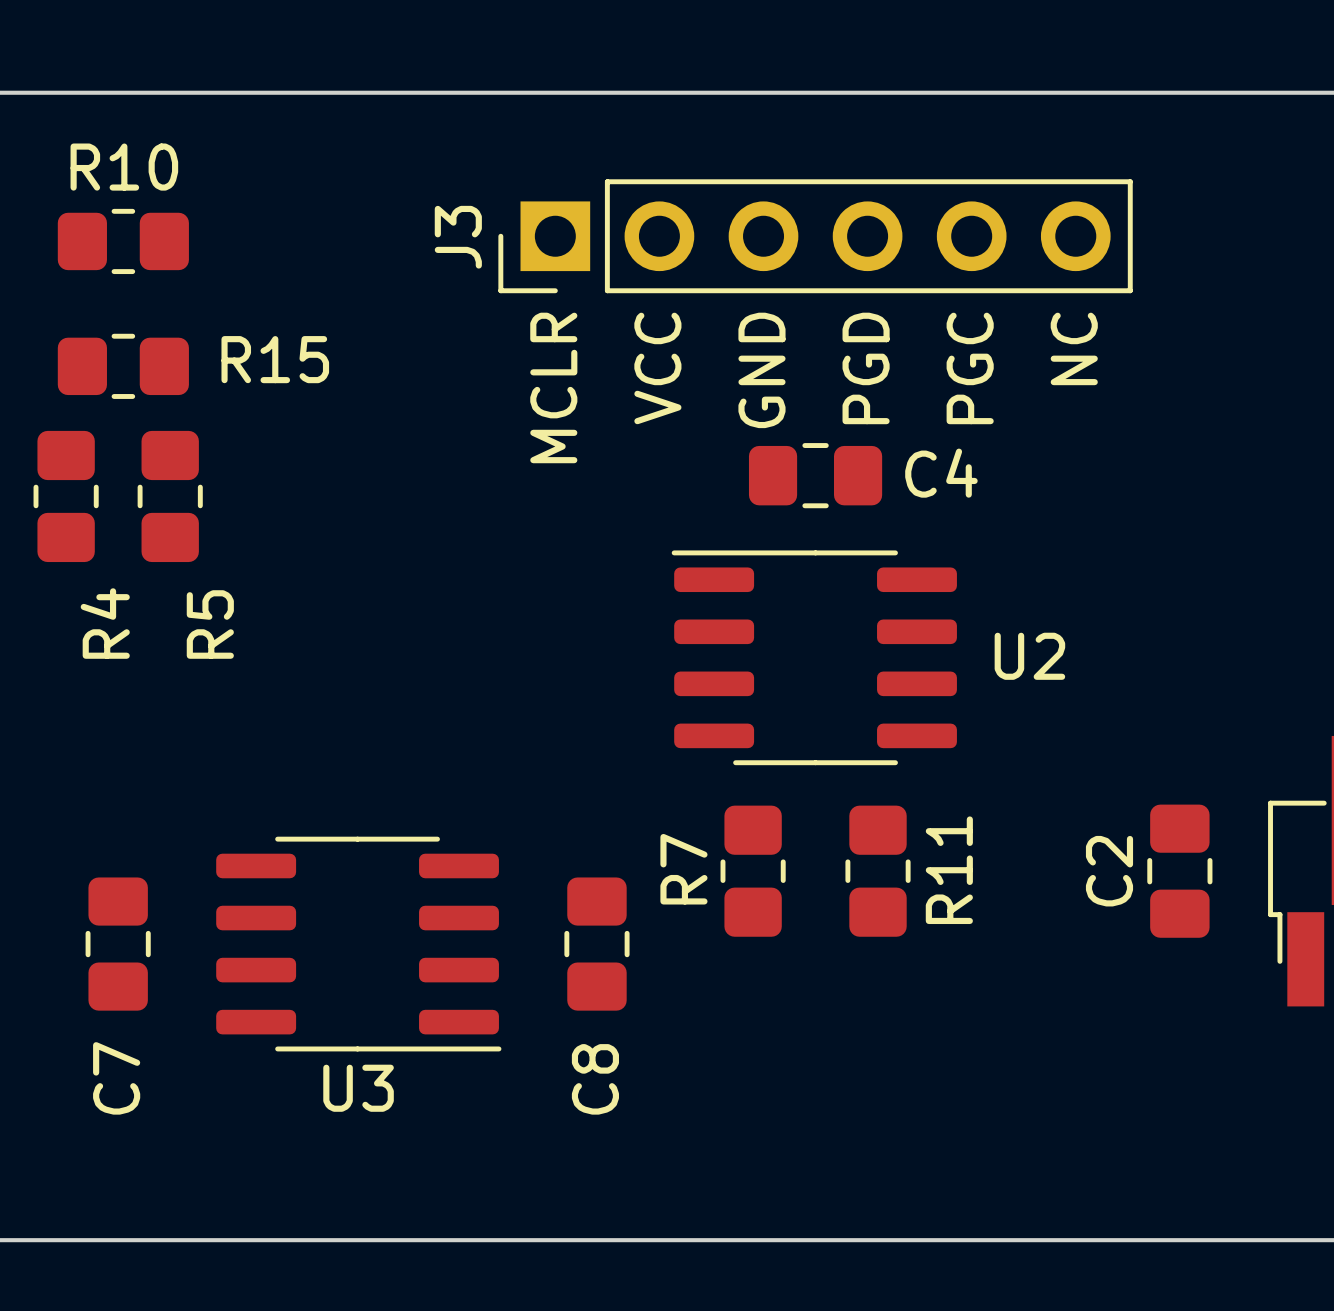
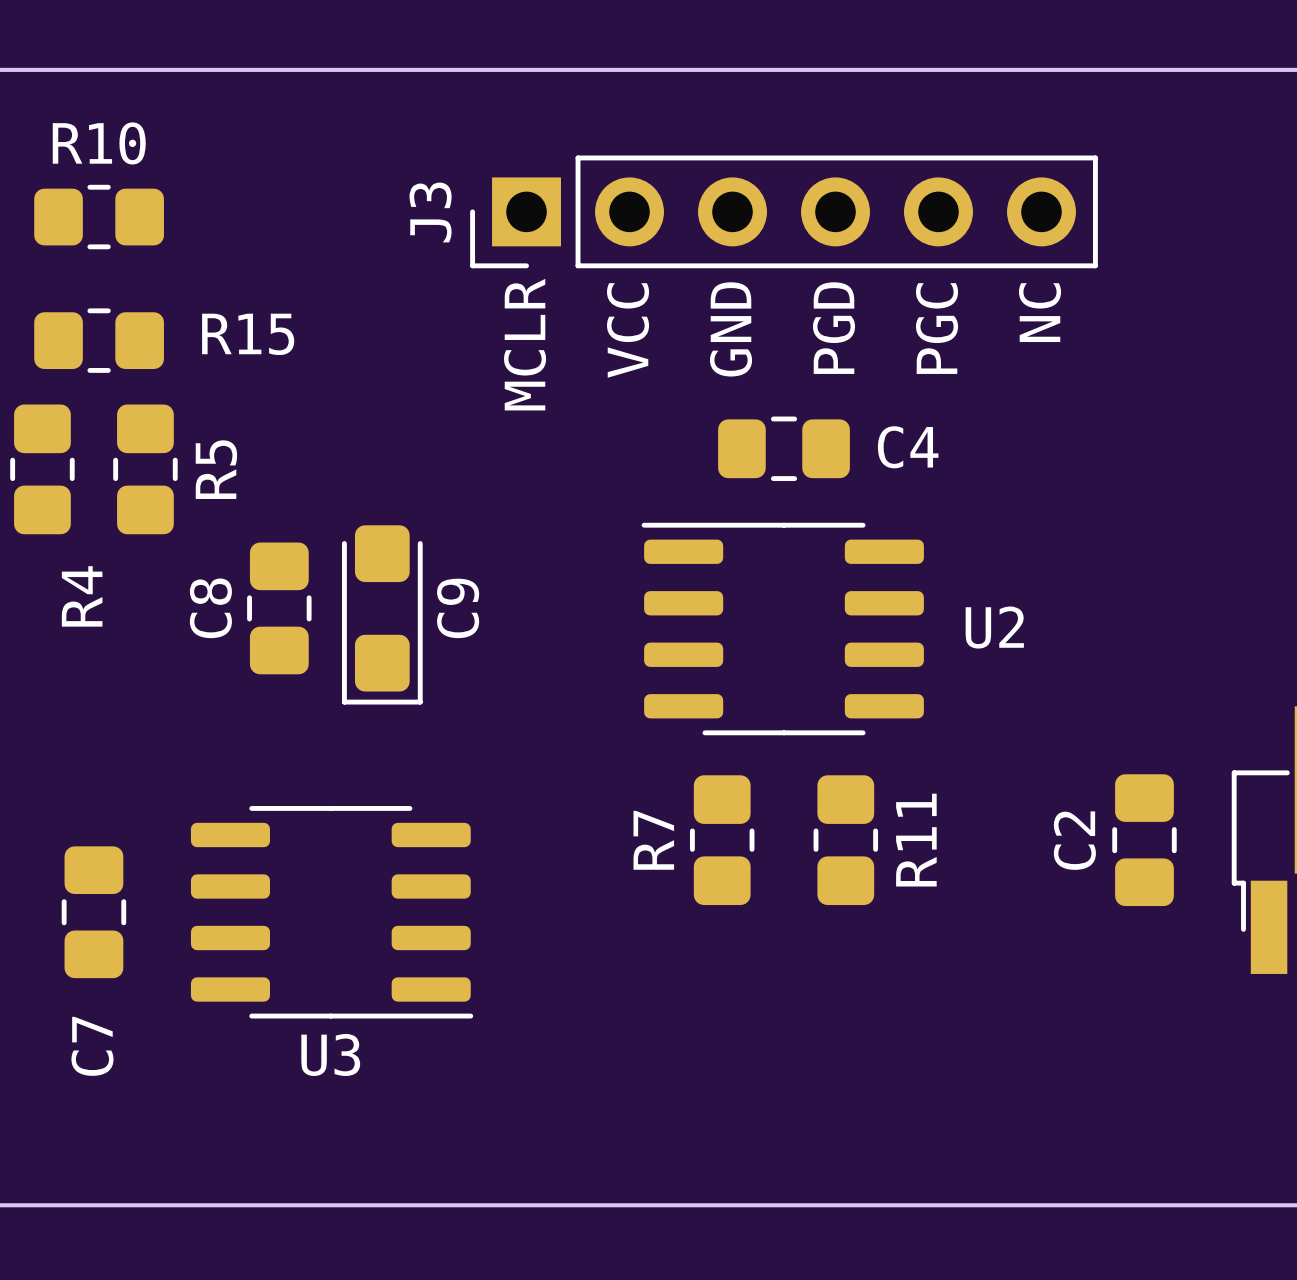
R5 name position: R5 (210, 624) -> R5 (216, 469)
C9: none -> (382, 614)
C8 position: (596, 944) -> (279, 608)
C8 name position: C8 (595, 1079) -> C8 (210, 608)

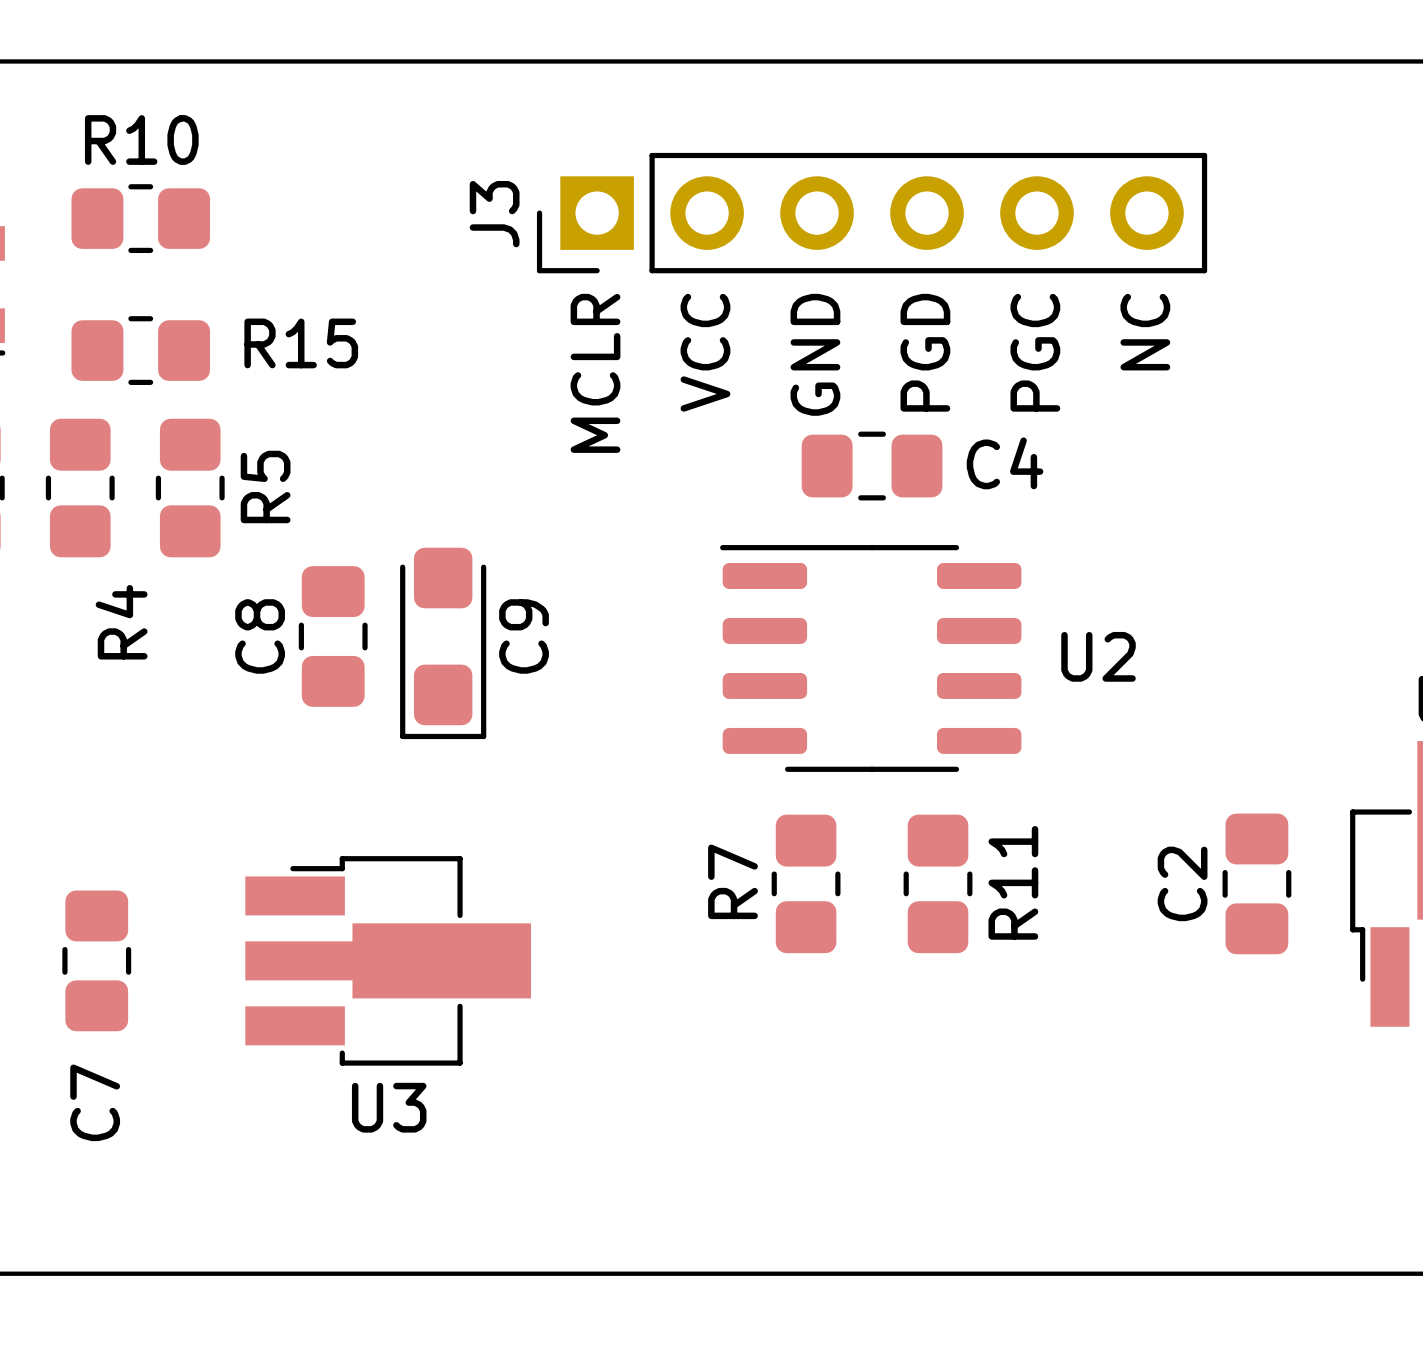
U3 footprint: [190, 806, 474, 1019] -> [245, 856, 532, 1066]
C7 position: (93, 912) -> (96, 960)

